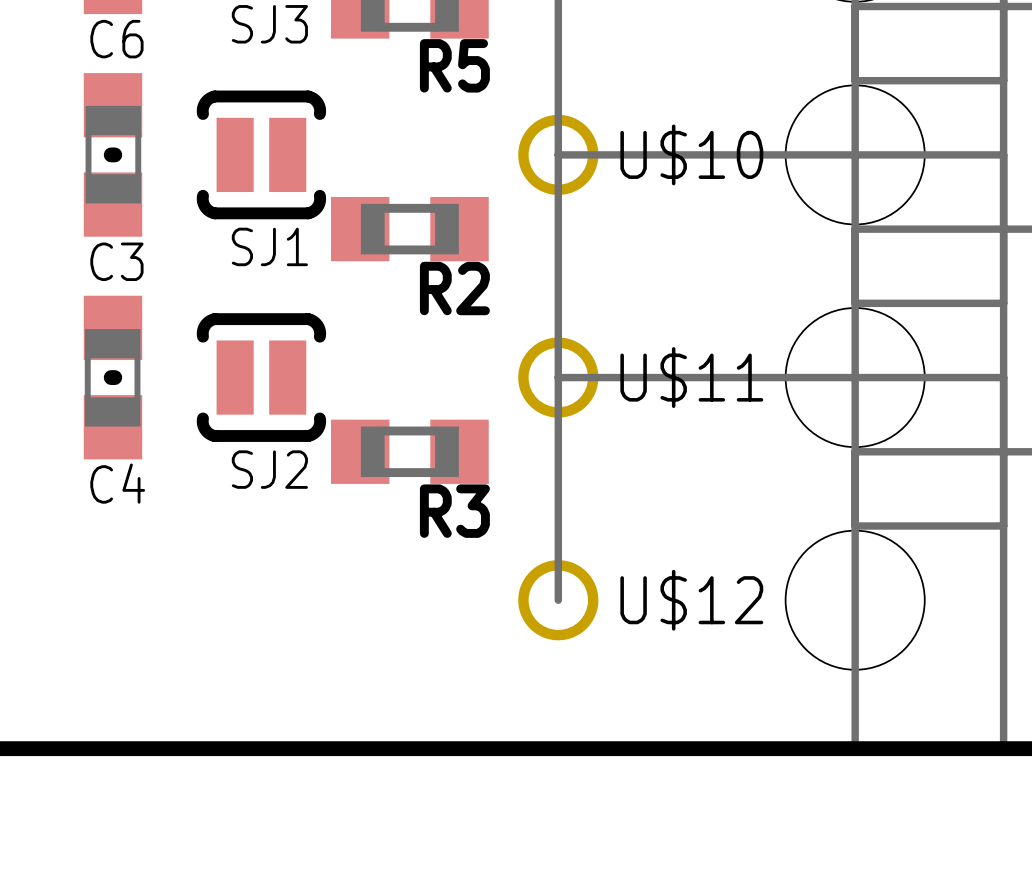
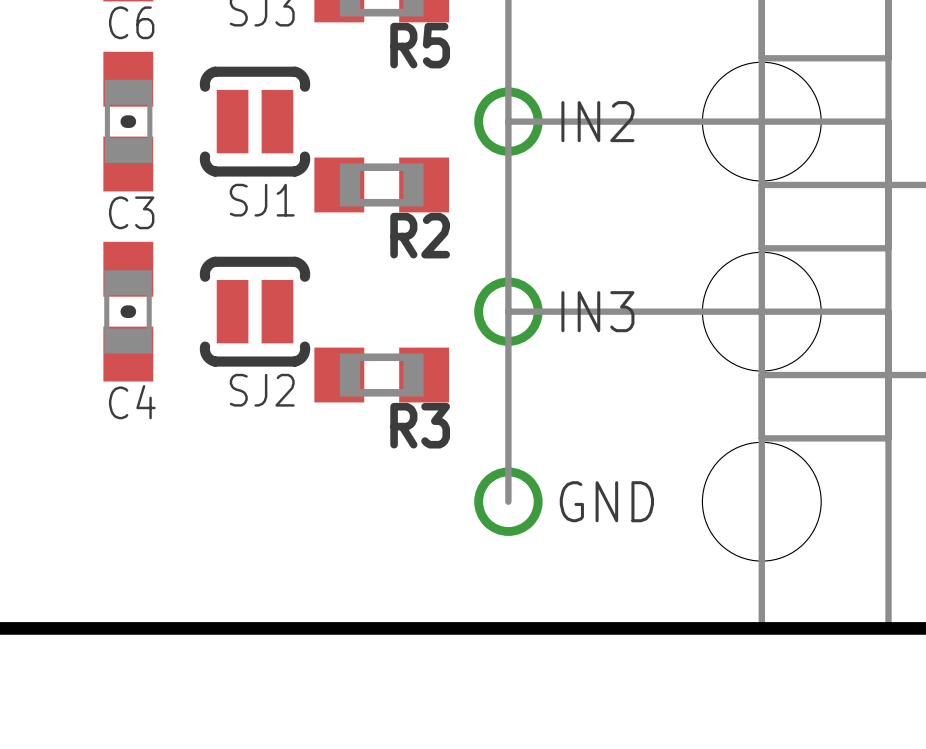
U$10 name: U$10 (691, 154) -> IN2 (597, 121)
U$11 name: U$11 (691, 377) -> IN3 (597, 311)
U$12 name: U$12 (691, 600) -> GND (606, 501)

